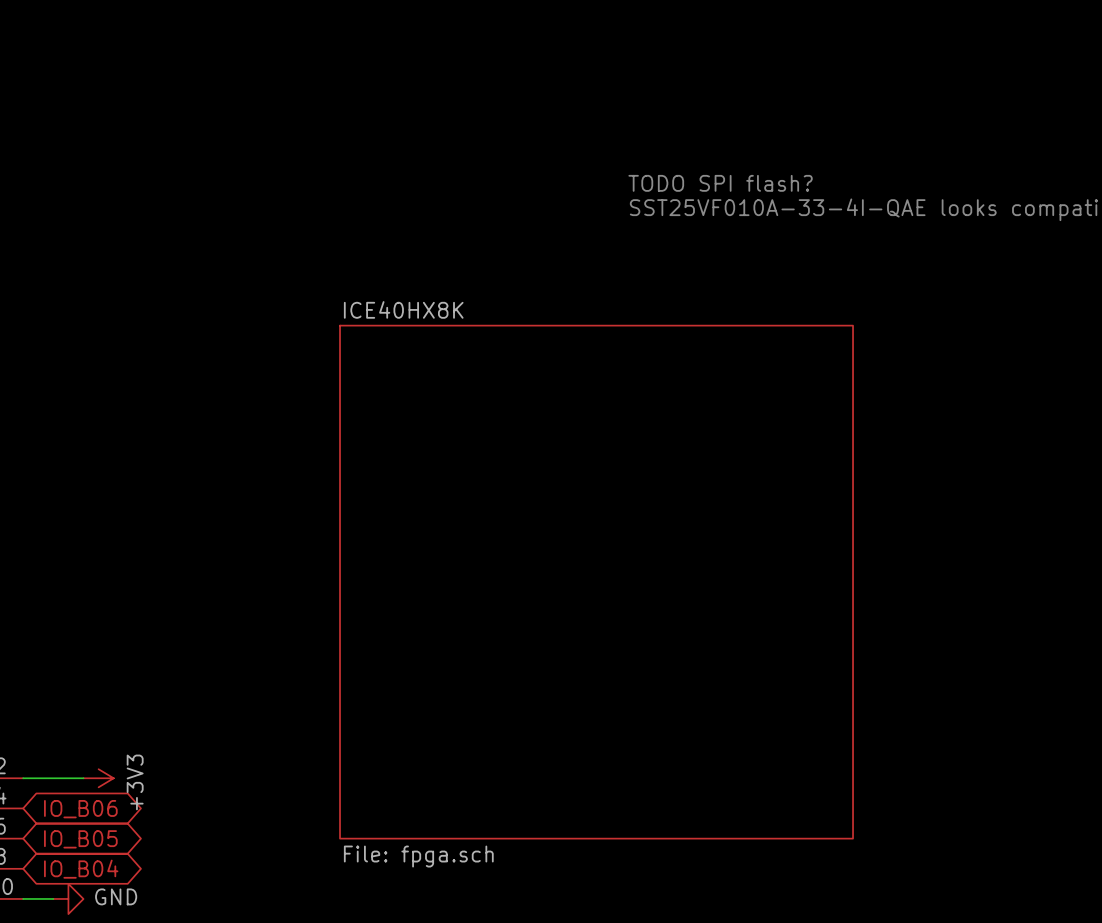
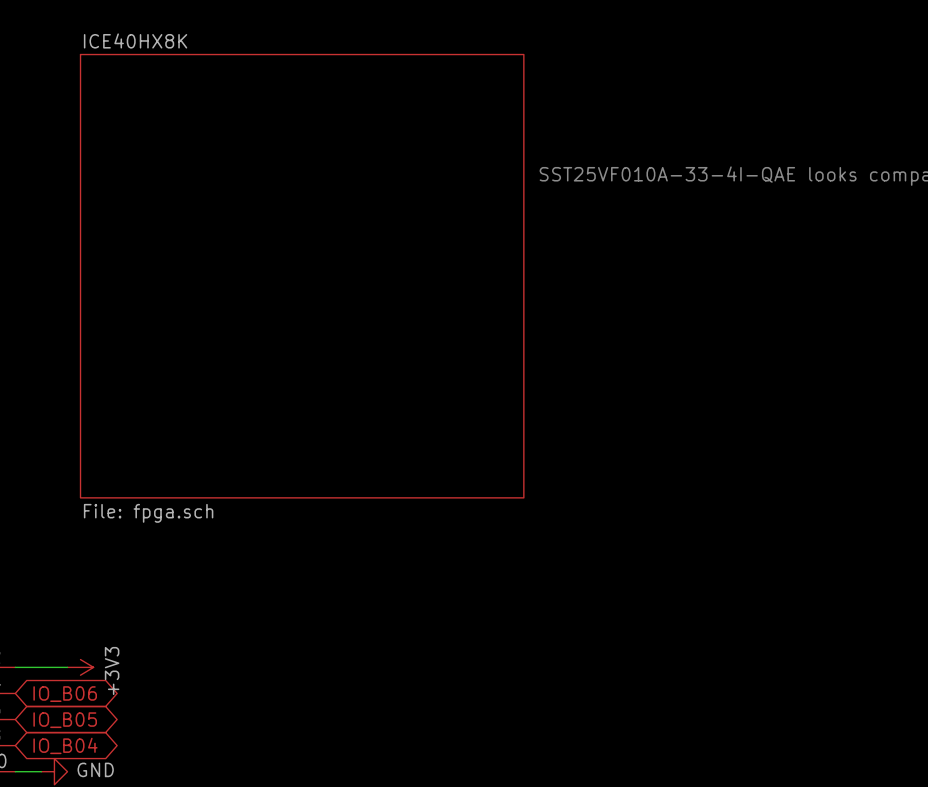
text: TODO SPI flash? (720, 183) -> none
sheet ICE40HX8K position: (596, 582) -> (302, 276)

